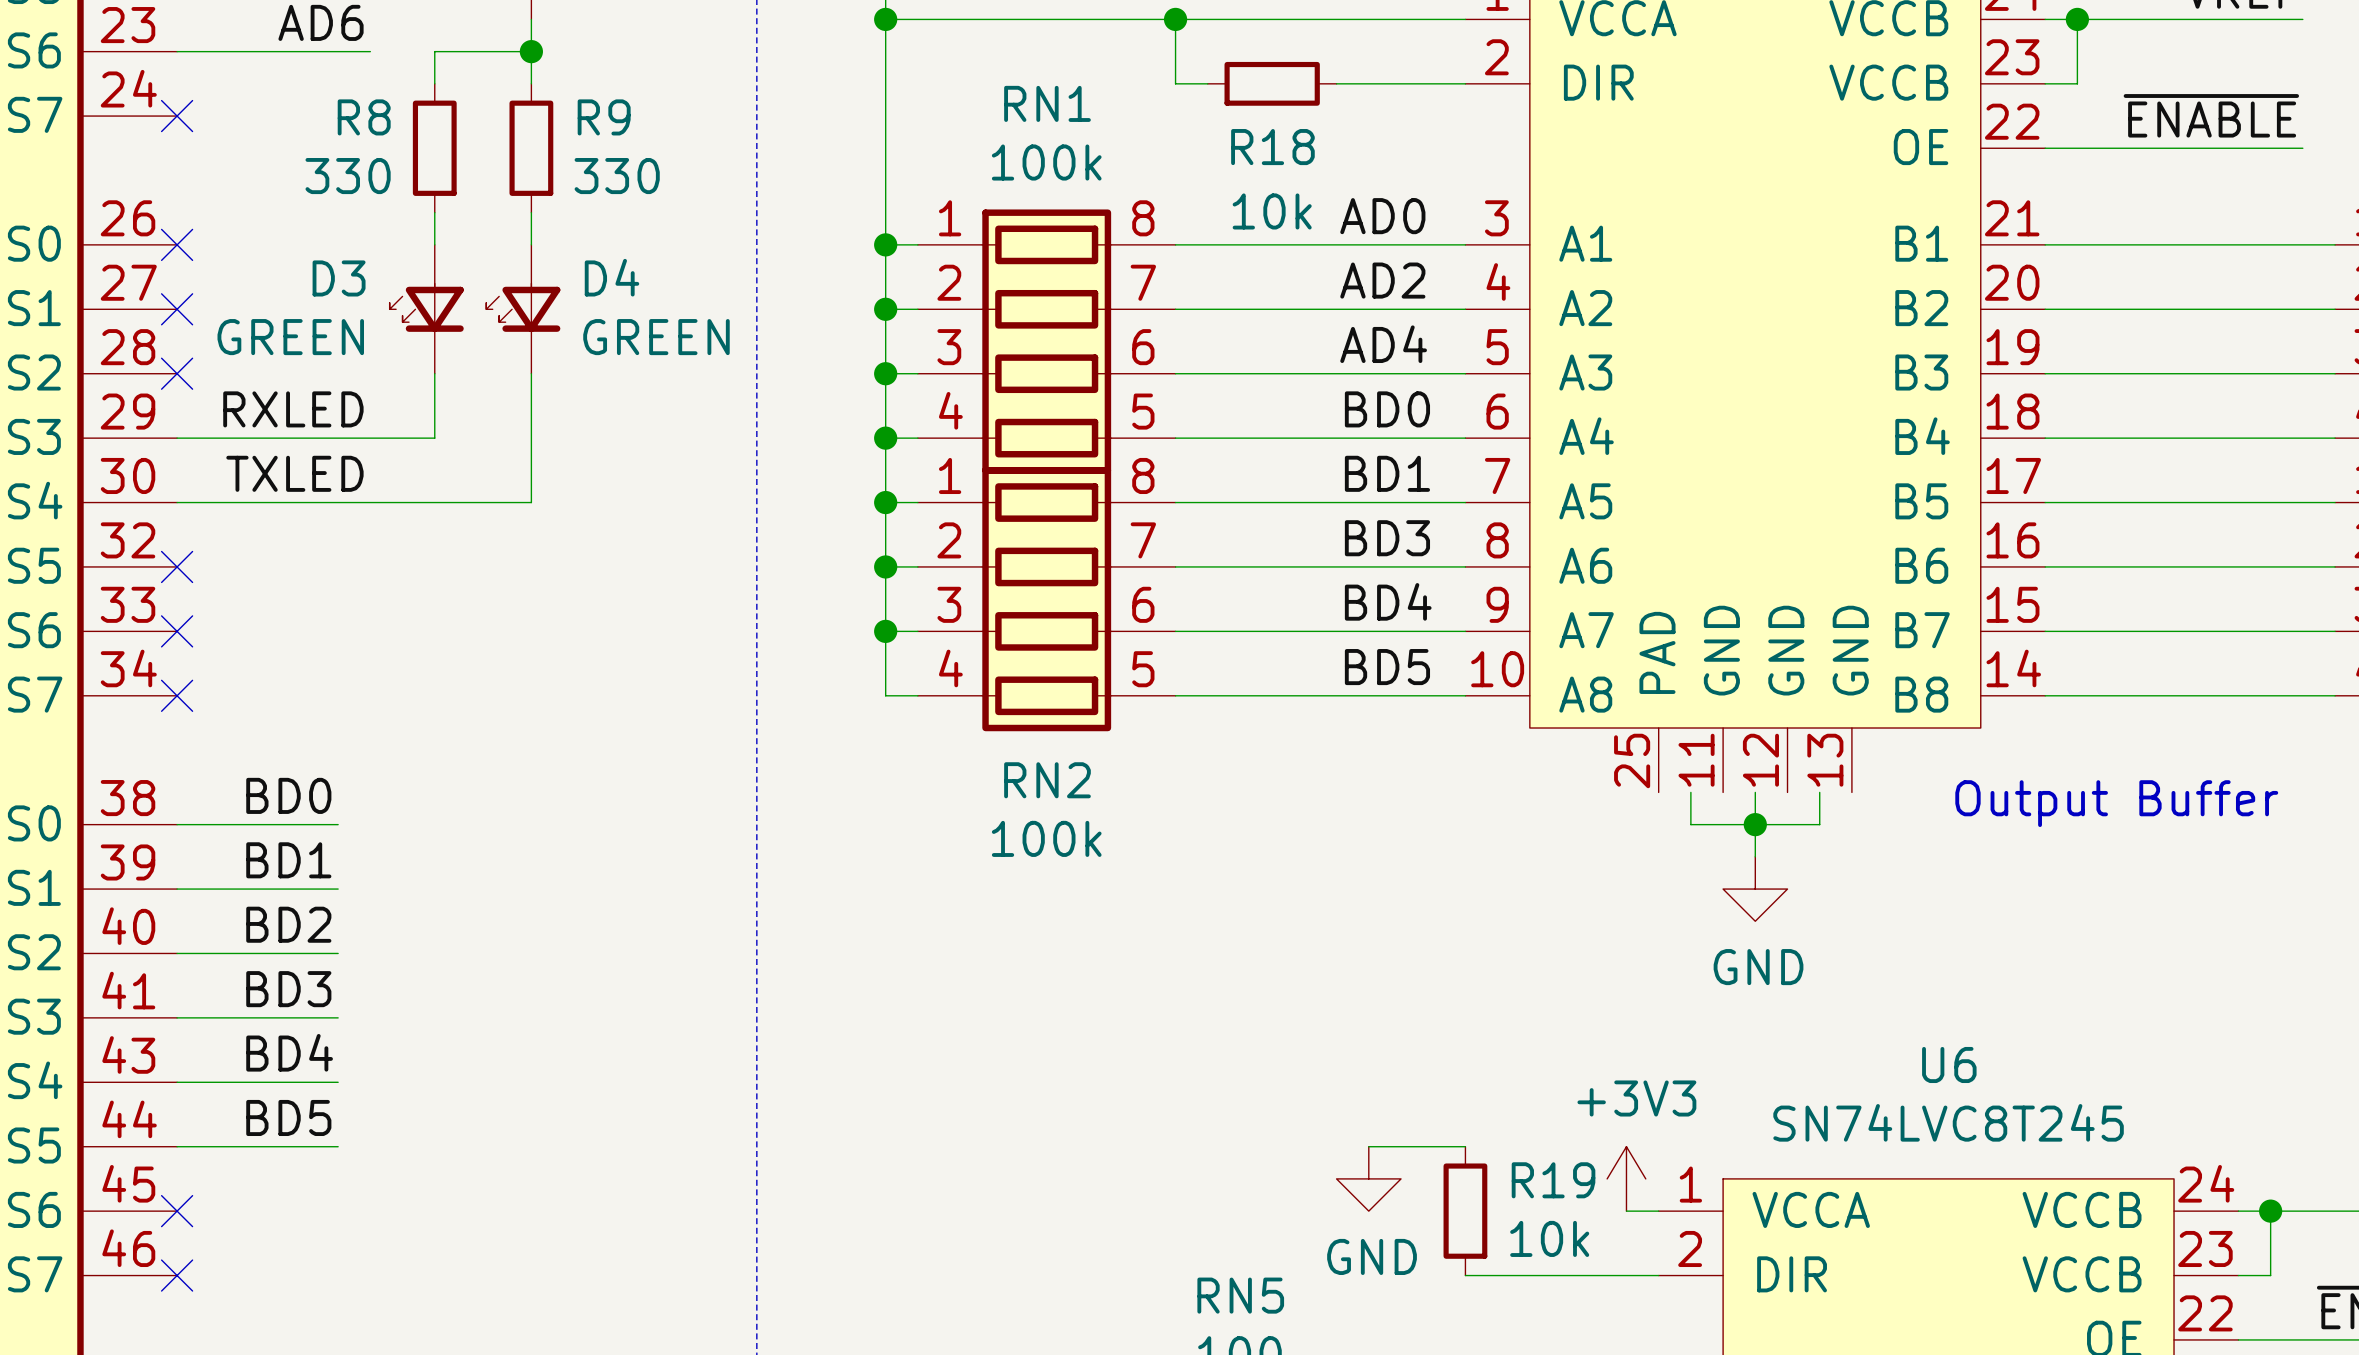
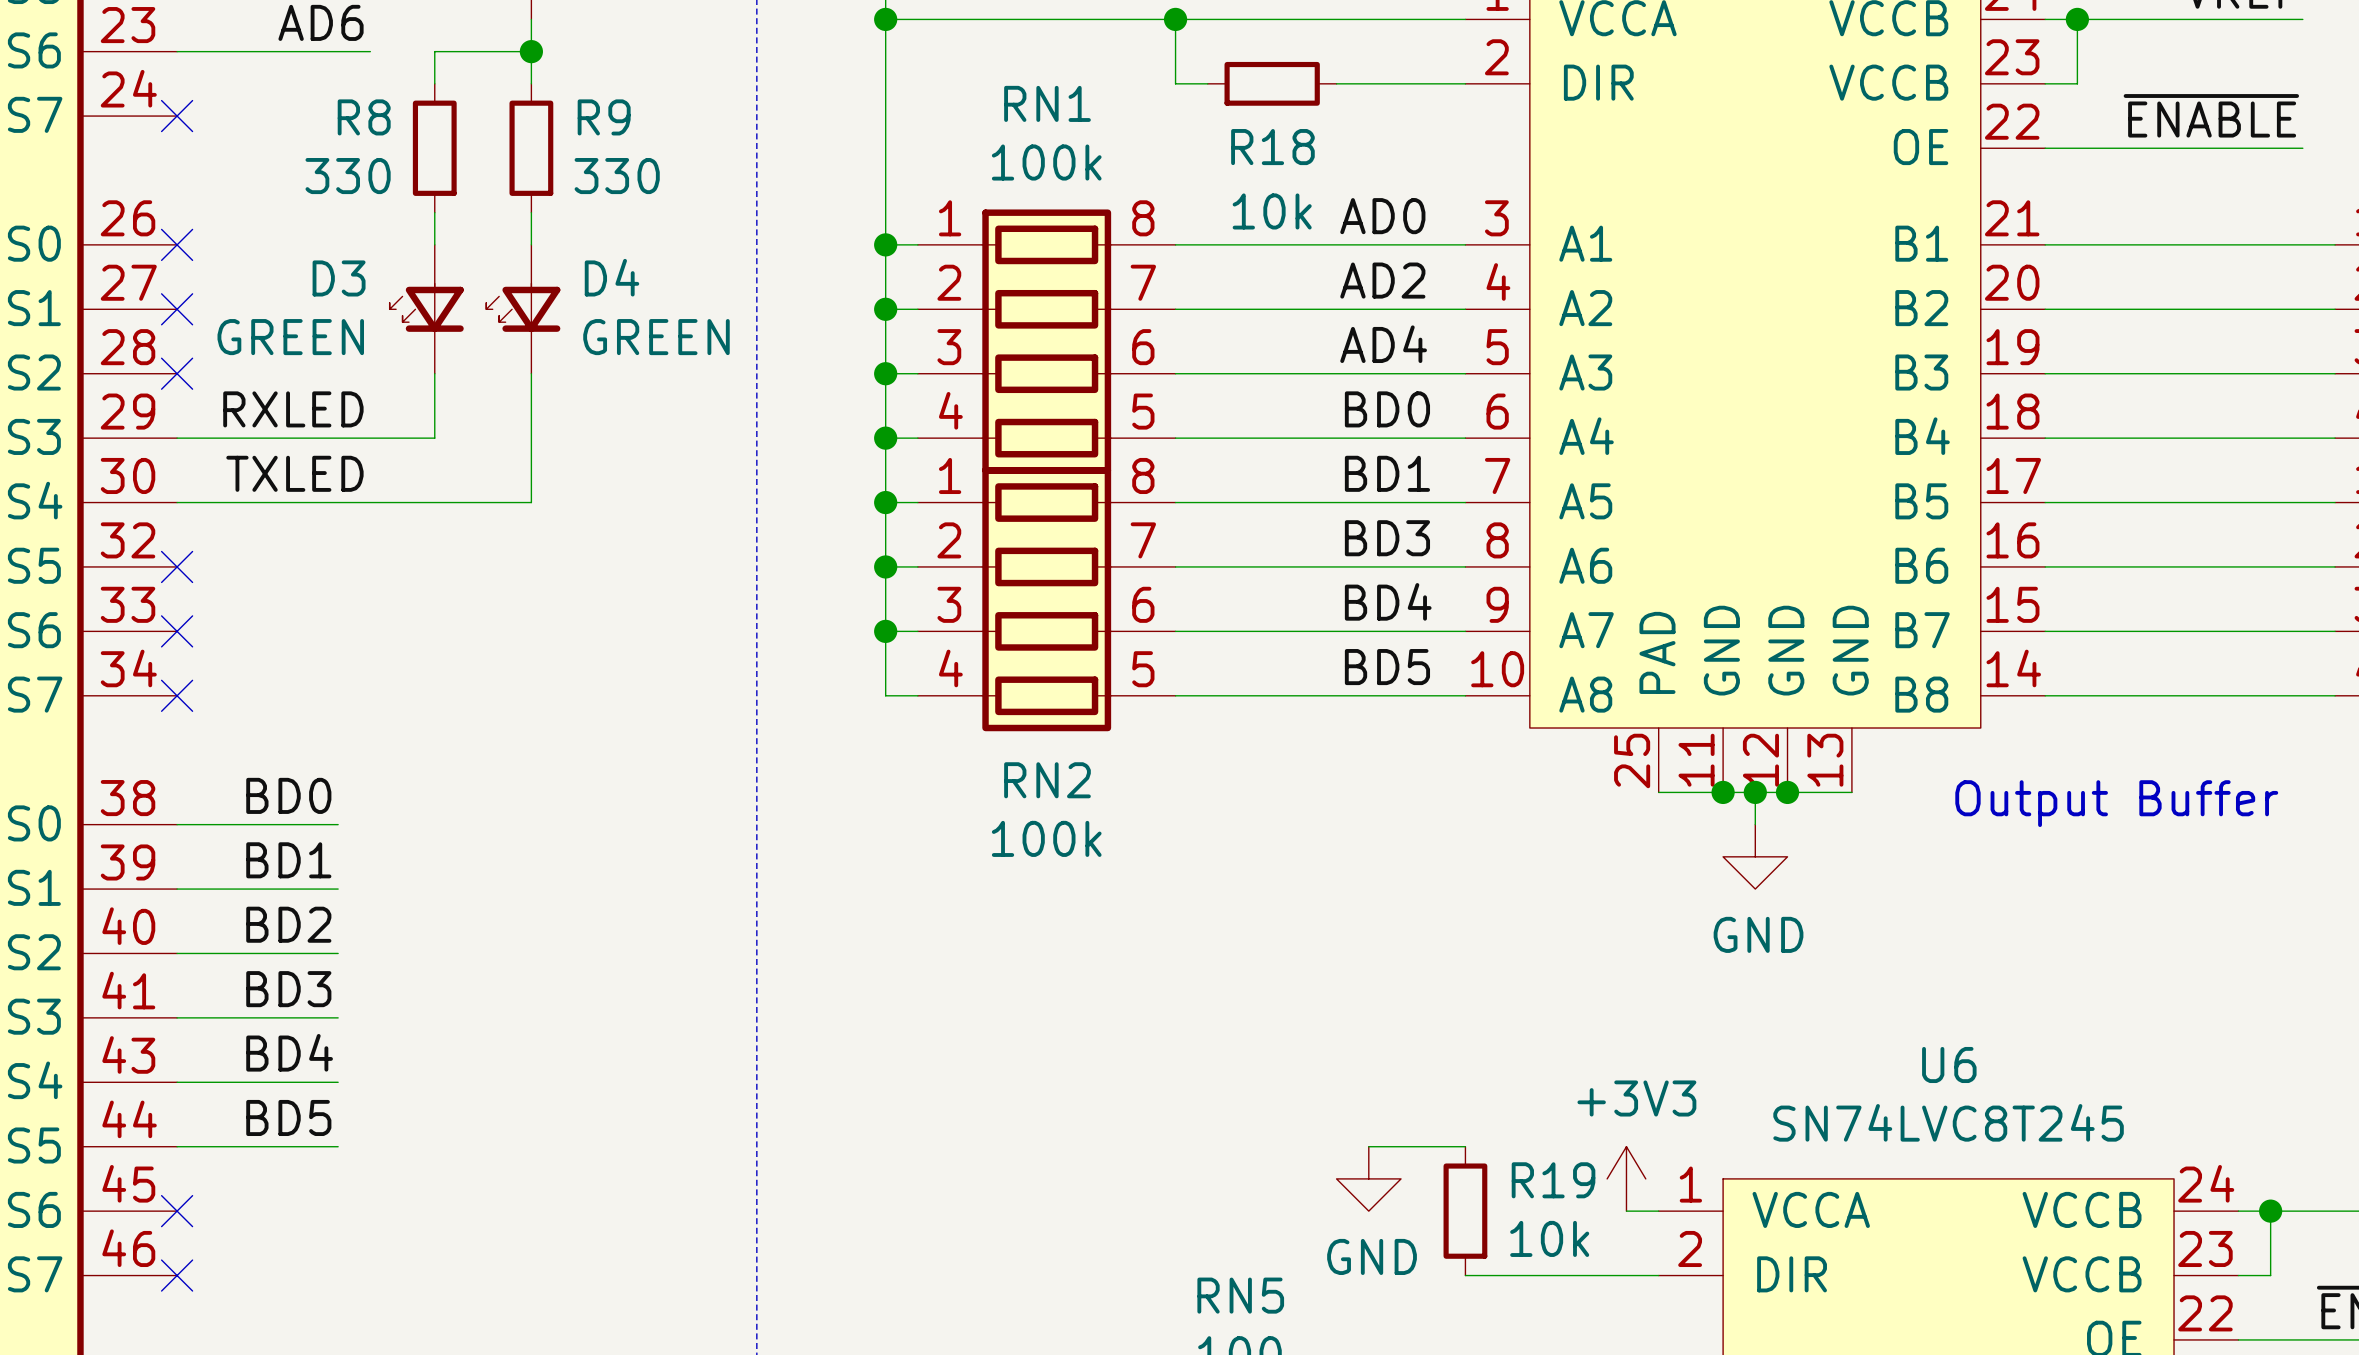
wire: none -> (1658, 792) (1851, 792)
wire: (1690, 792) (1690, 824) (1819, 824) (1819, 792) -> none
junction: none -> (1723, 792)
junction: none -> (1755, 792)
junction: none -> (1787, 792)
junction: (1755, 824) -> none
power symbol position: GND (1755, 889) -> GND (1755, 856)

